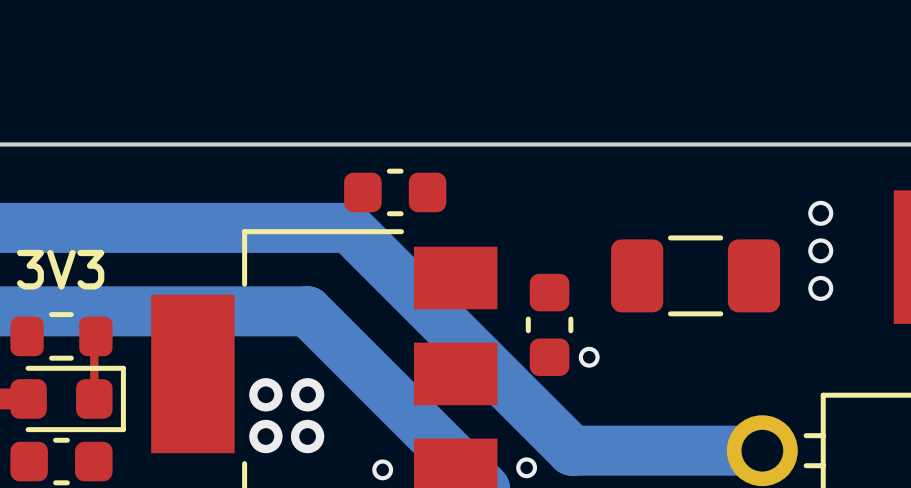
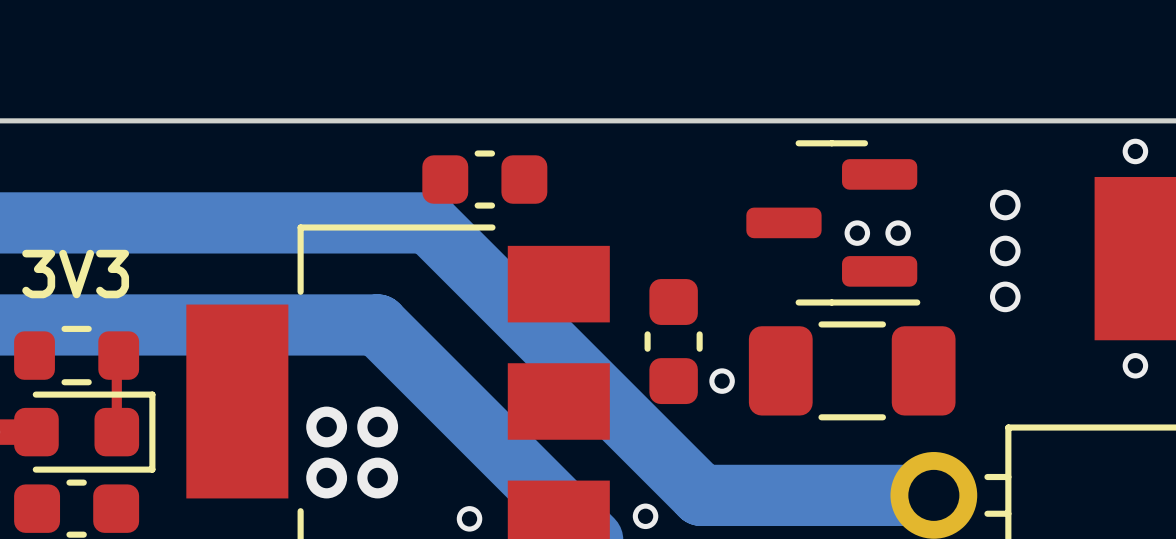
part: none -> (833, 222)
via: none -> (857, 233)
via: none -> (898, 233)
part position: (695, 275) -> (852, 370)

